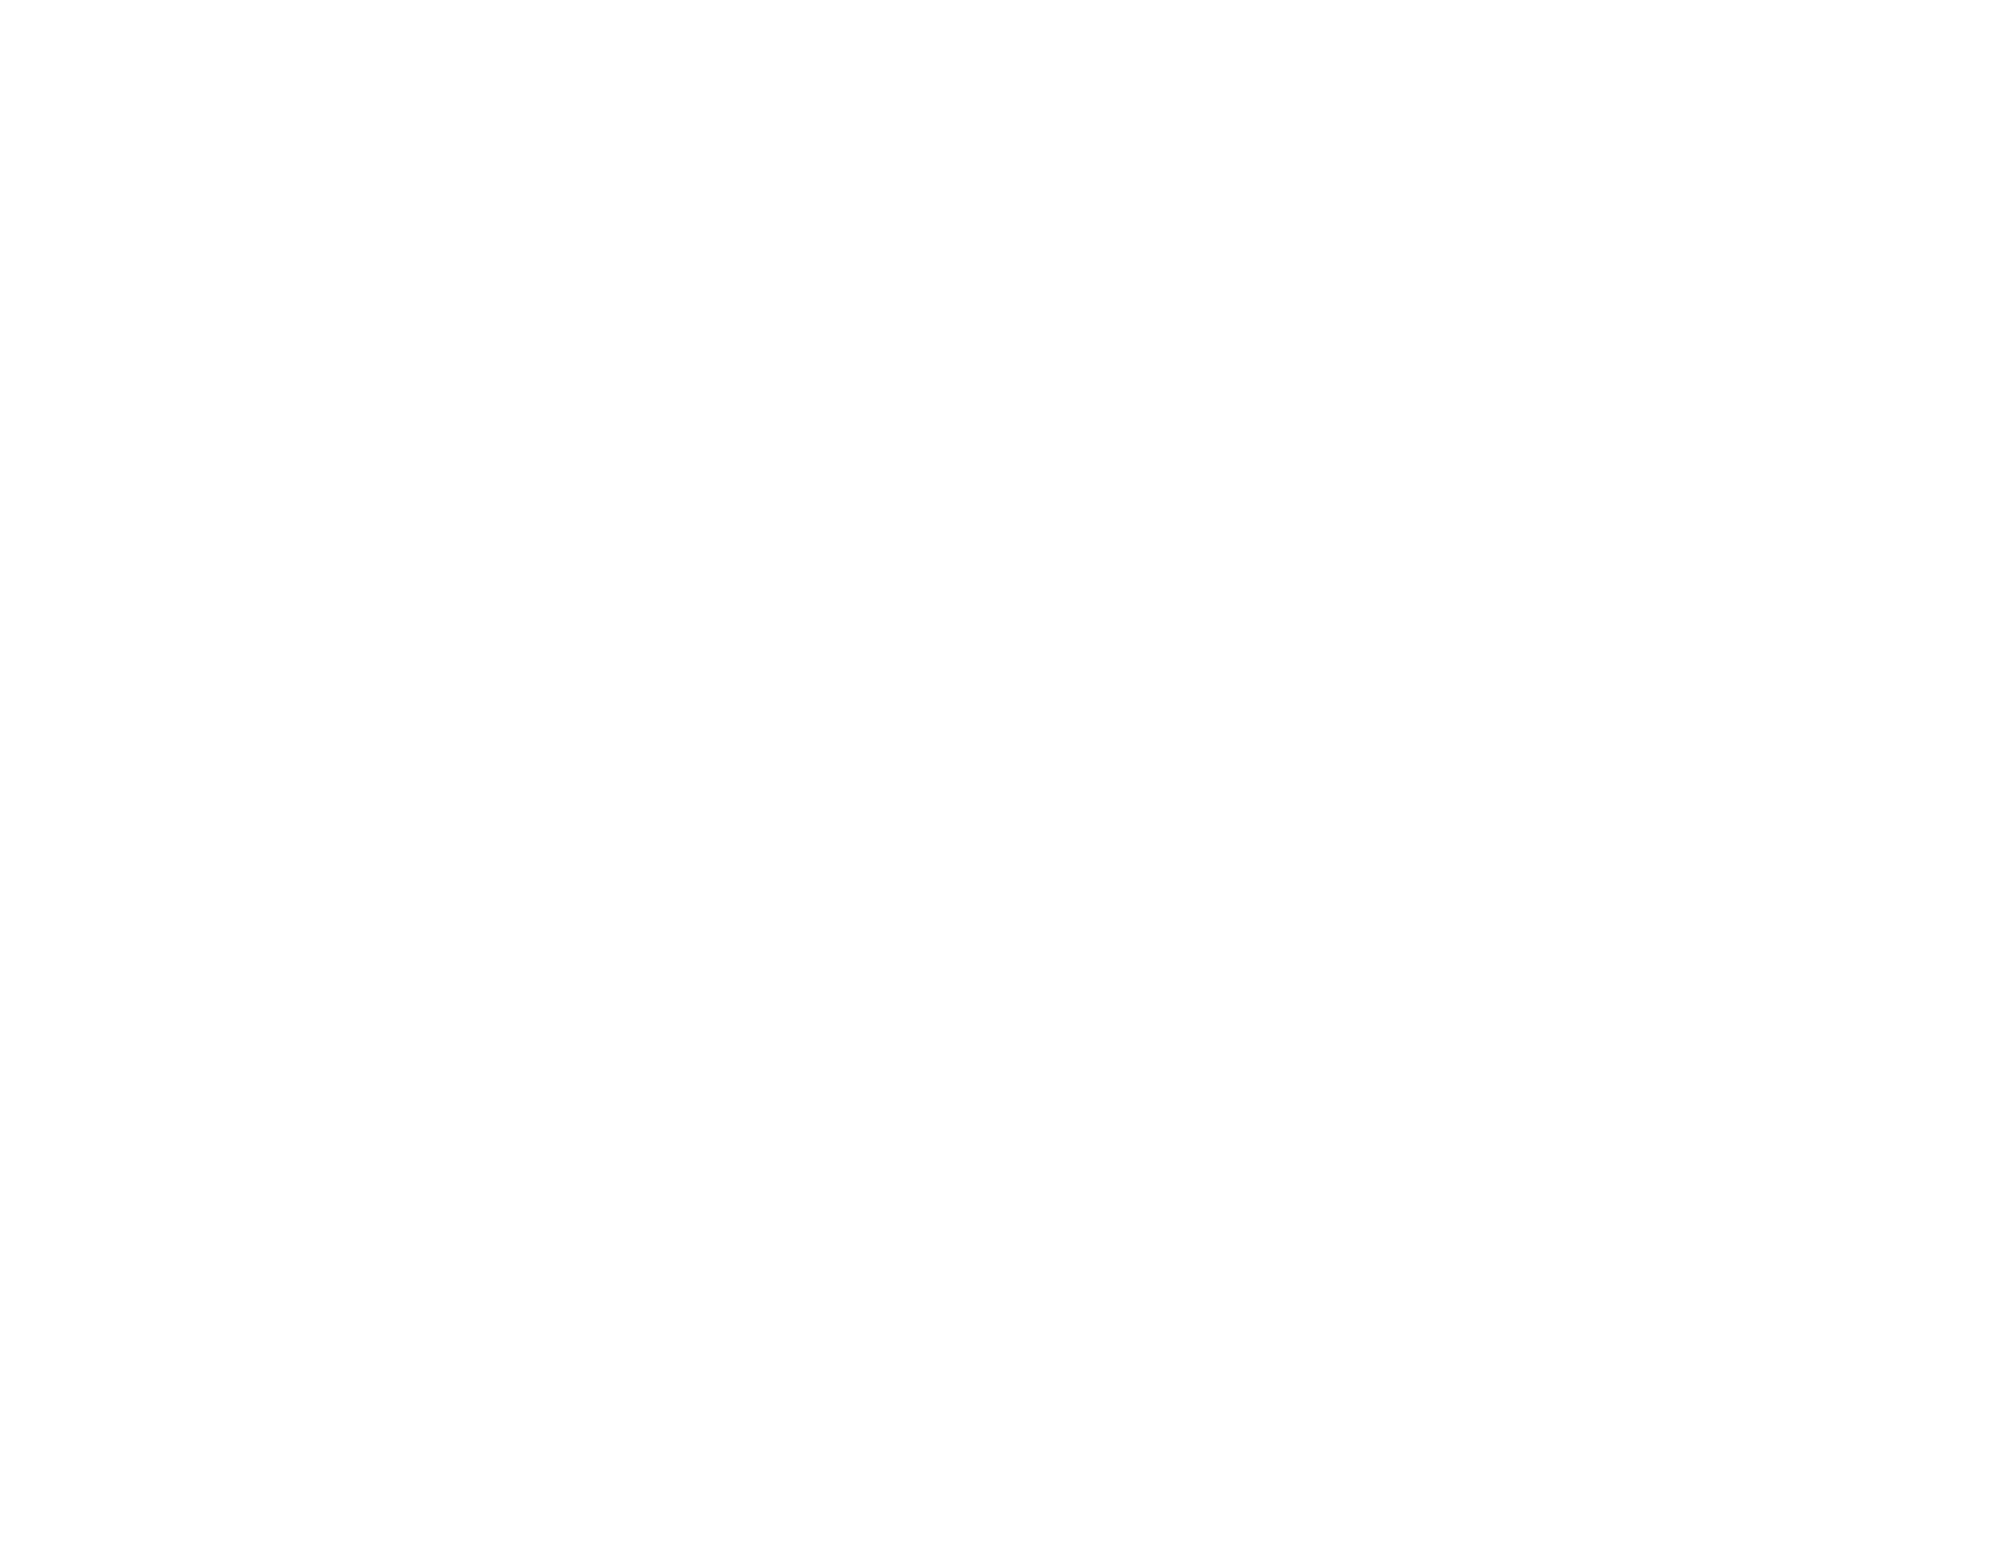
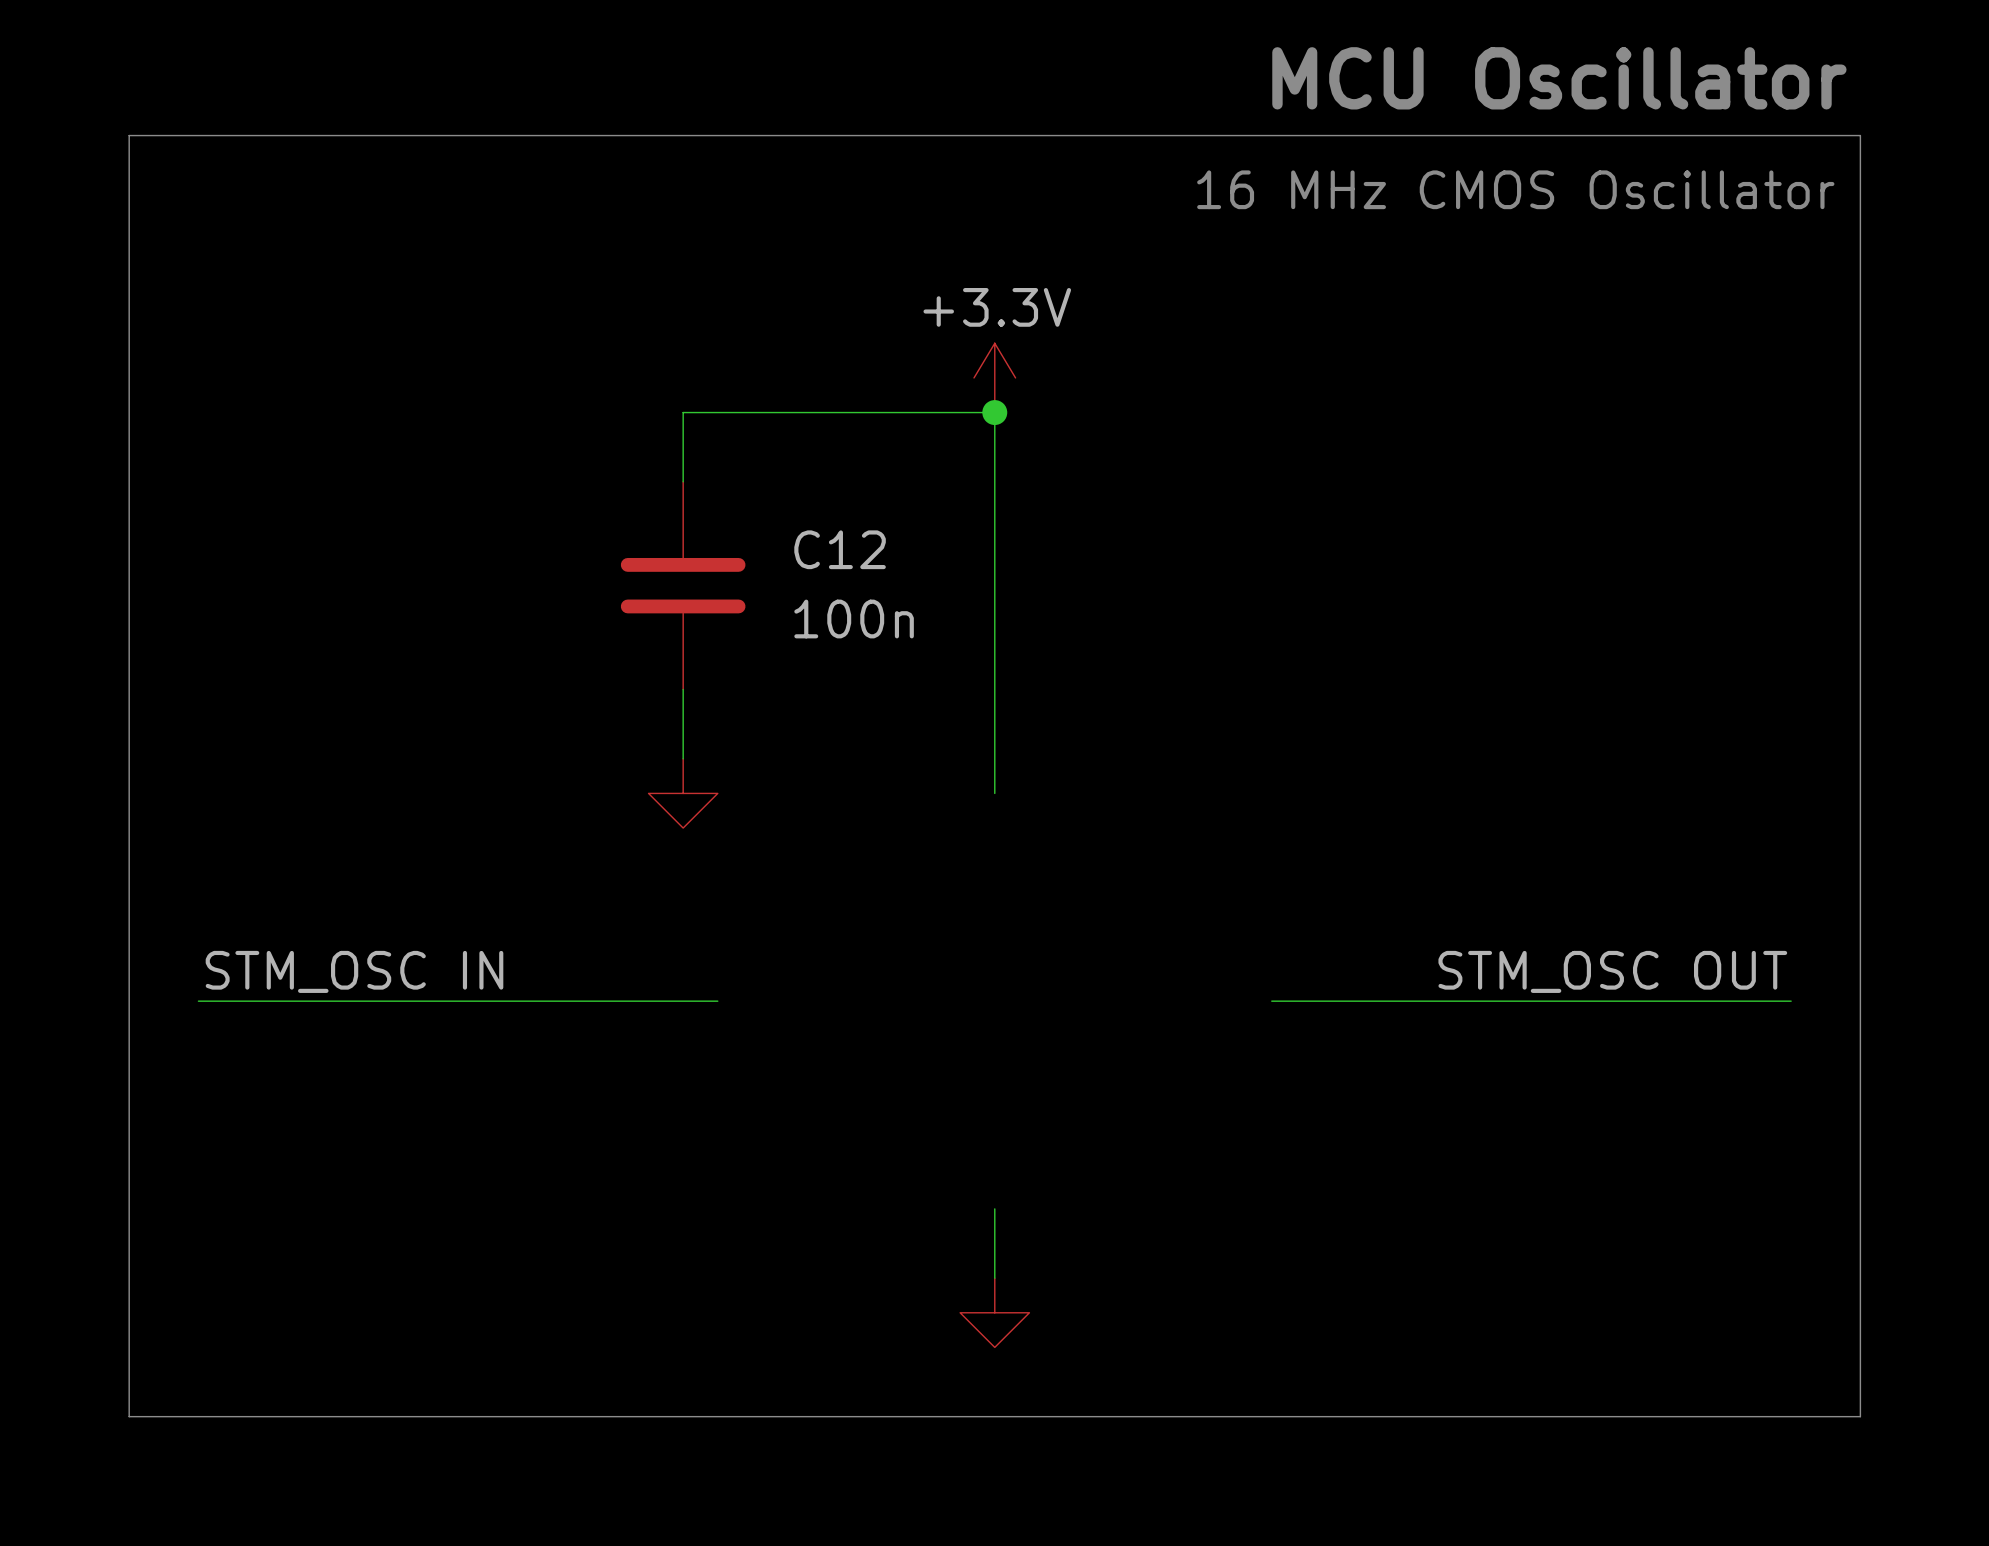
text: none -> MCU Oscillator (1559, 78)
line: none -> (129, 135) (1860, 135) (1860, 1416) (129, 1416) (129, 135)
text: none -> 16 MHz CMOS Oscillator (1515, 189)
power symbol: none -> +3.3V (994, 377)
junction: none -> (994, 412)
wire: none -> (683, 481) (683, 412) (994, 412) (994, 793)
C12: none -> 100n (683, 585)
wire: none -> (683, 689) (683, 758)
power symbol: none -> (683, 793)
label: none -> STM_OSC IN (354, 971)
label: none -> STM_OSC OUT (1612, 971)
wire: none -> (198, 1001) (717, 1001)
wire: none -> (1271, 1001) (1791, 1001)
wire: none -> (994, 1208) (994, 1278)
power symbol: none -> (994, 1312)

